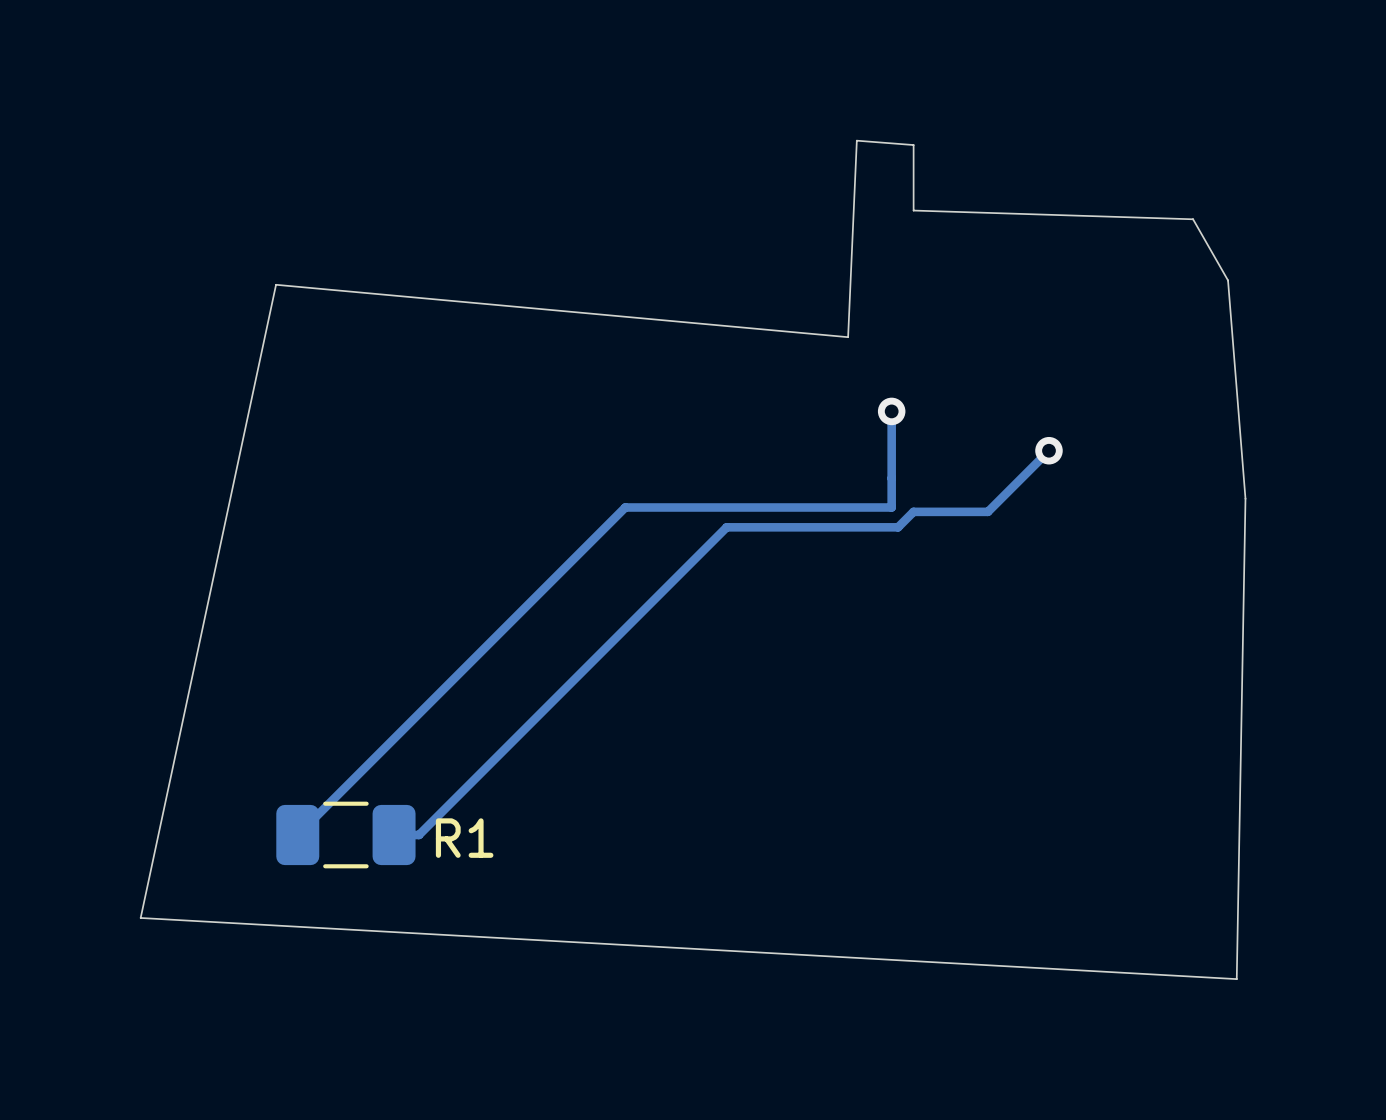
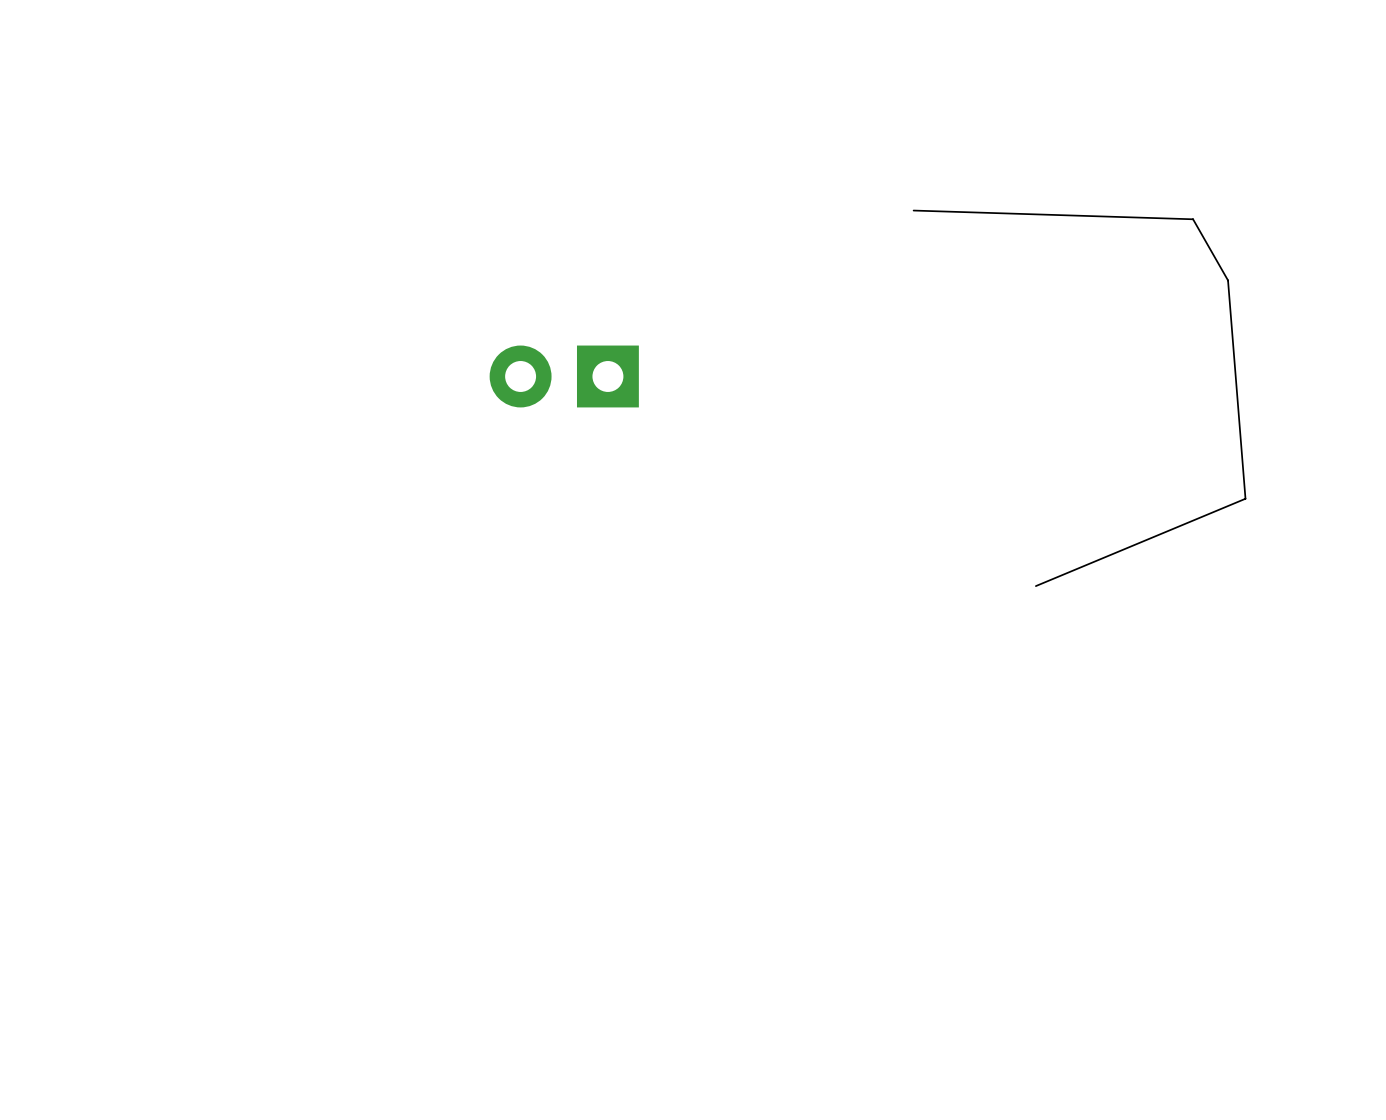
board edge: (913, 210) (913, 145) (856, 140) (848, 337) (276, 284) (140, 917) (1236, 979) (1245, 498) -> (1035, 586) (1245, 498)
part: none -> (564, 376)
track: (891, 411) (891, 507) (625, 507) (297, 835) -> none
via: (891, 411) -> none
track: (1048, 450) (987, 511) (913, 511) (898, 527) (726, 527) (418, 835) (394, 835) -> none
via: (1048, 450) -> none
R1: (345, 835) -> none

